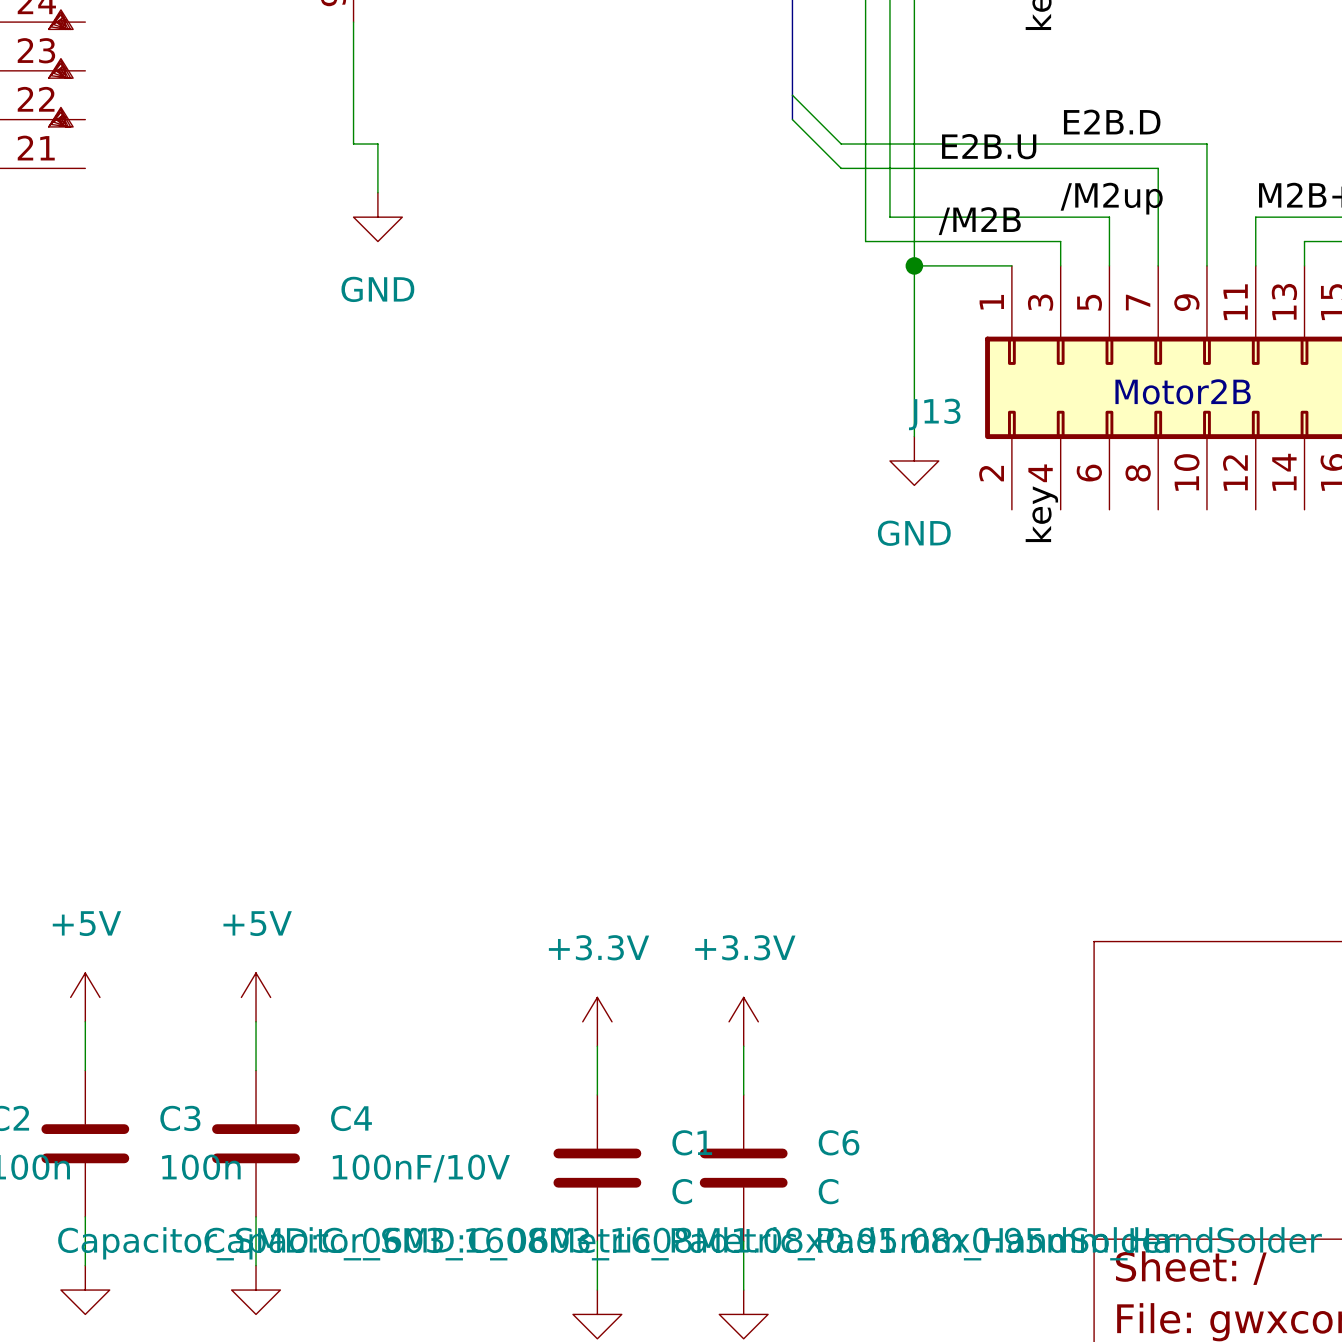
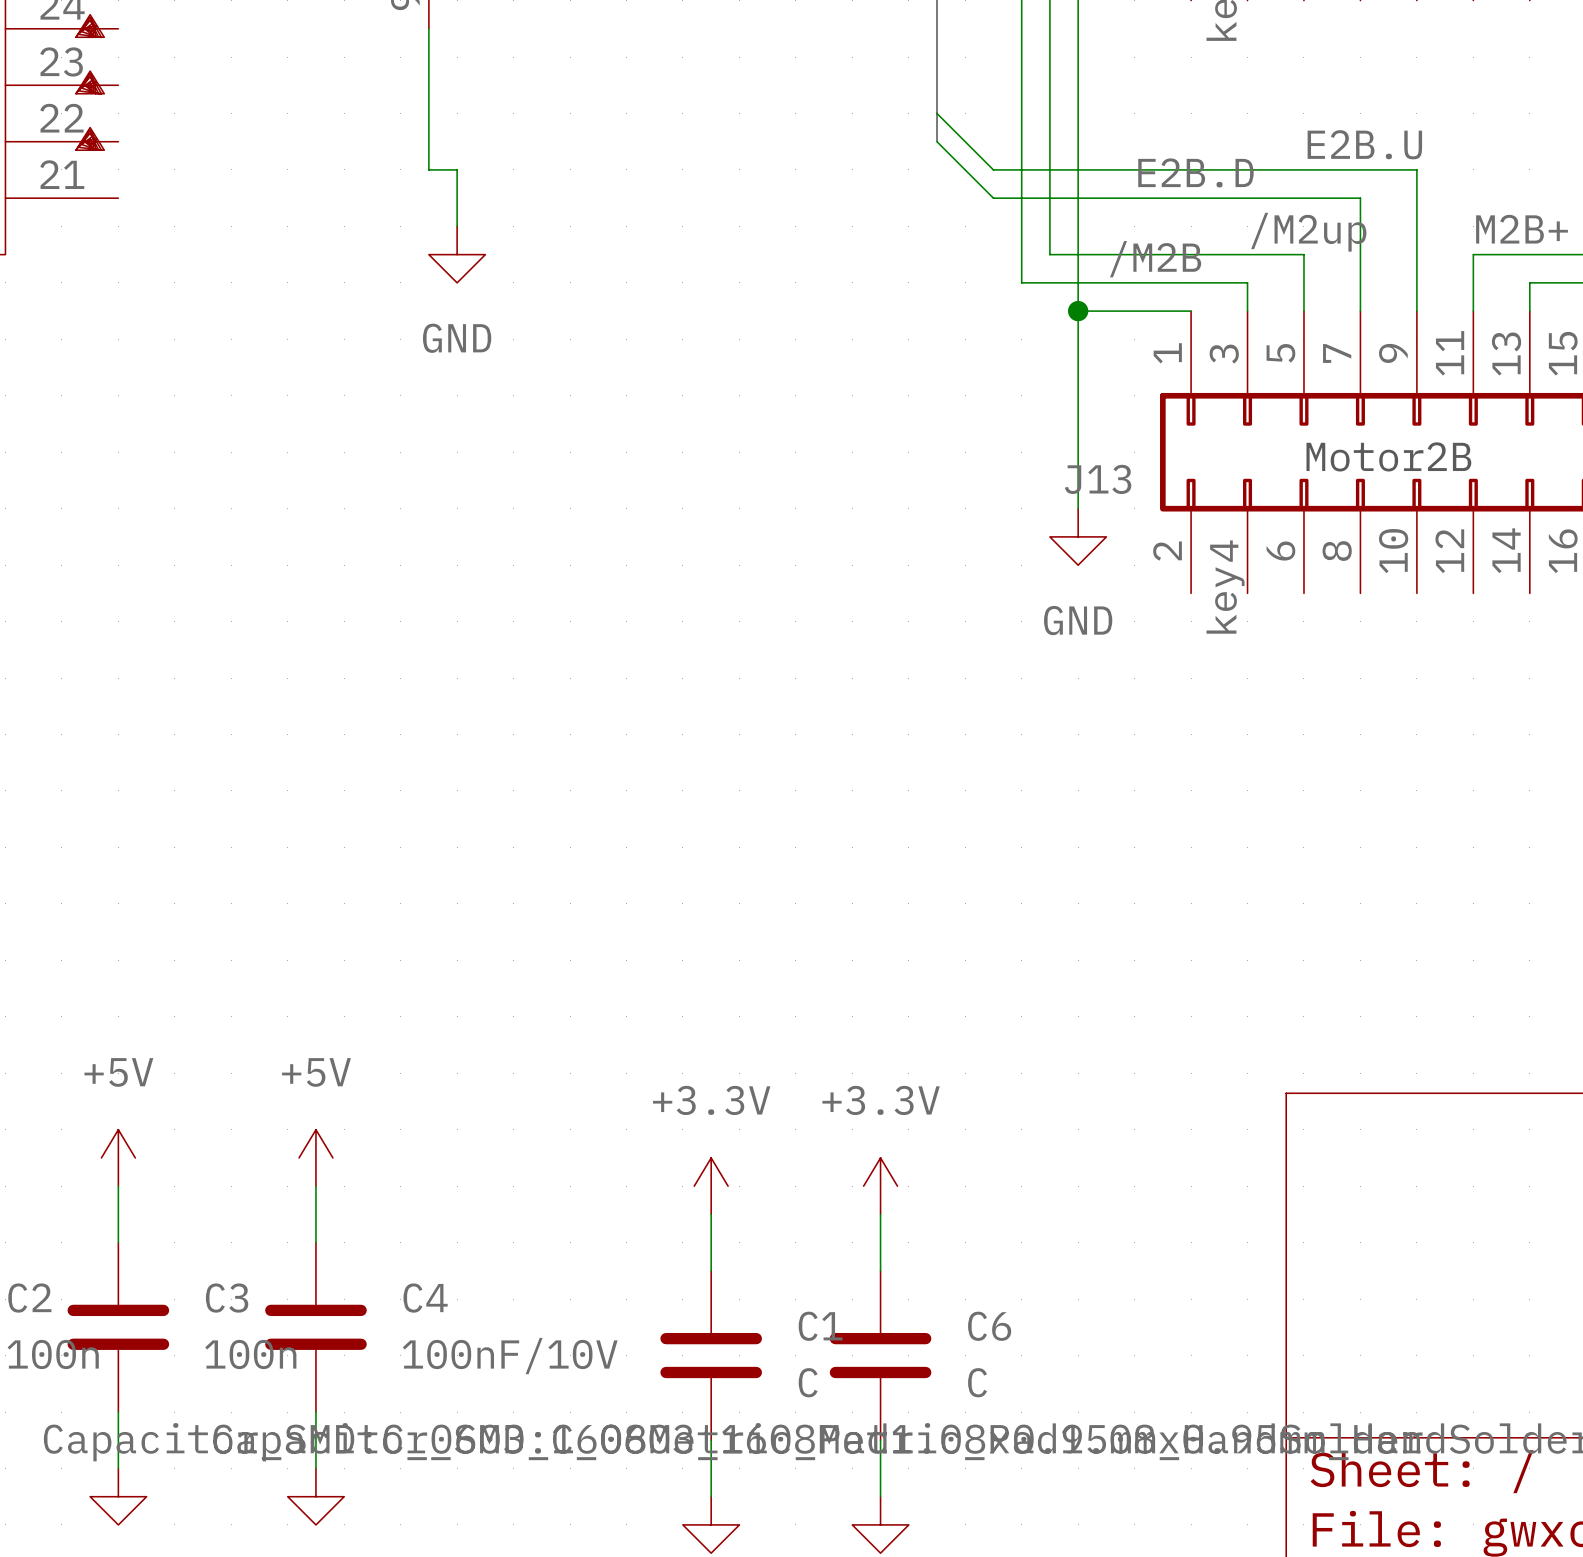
label position: E2B.D (1112, 122) -> E2B.D (1195, 172)
label position: E2B.U (989, 146) -> E2B.U (1364, 144)

